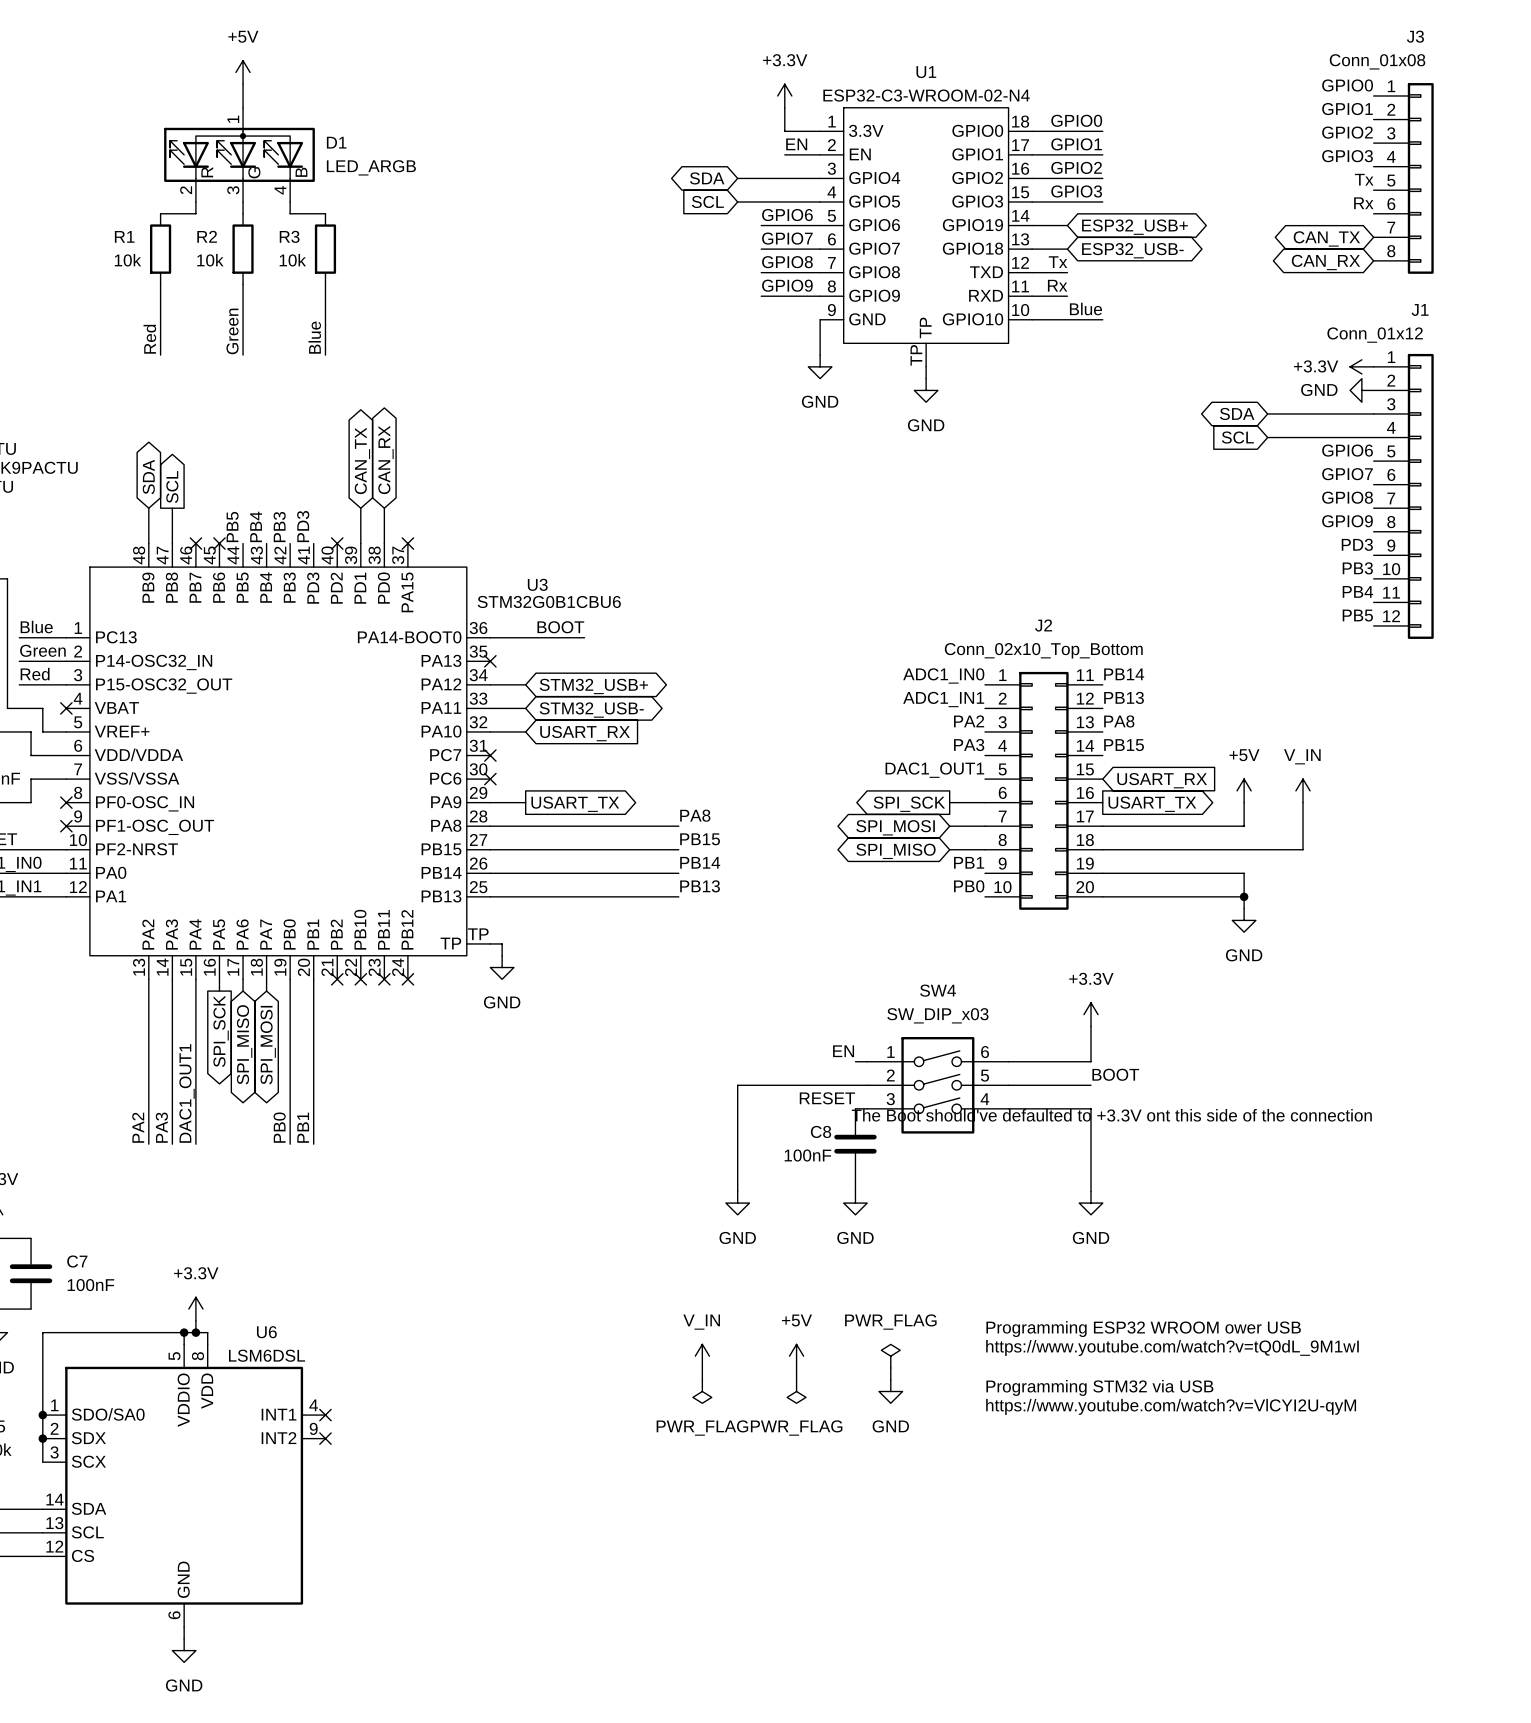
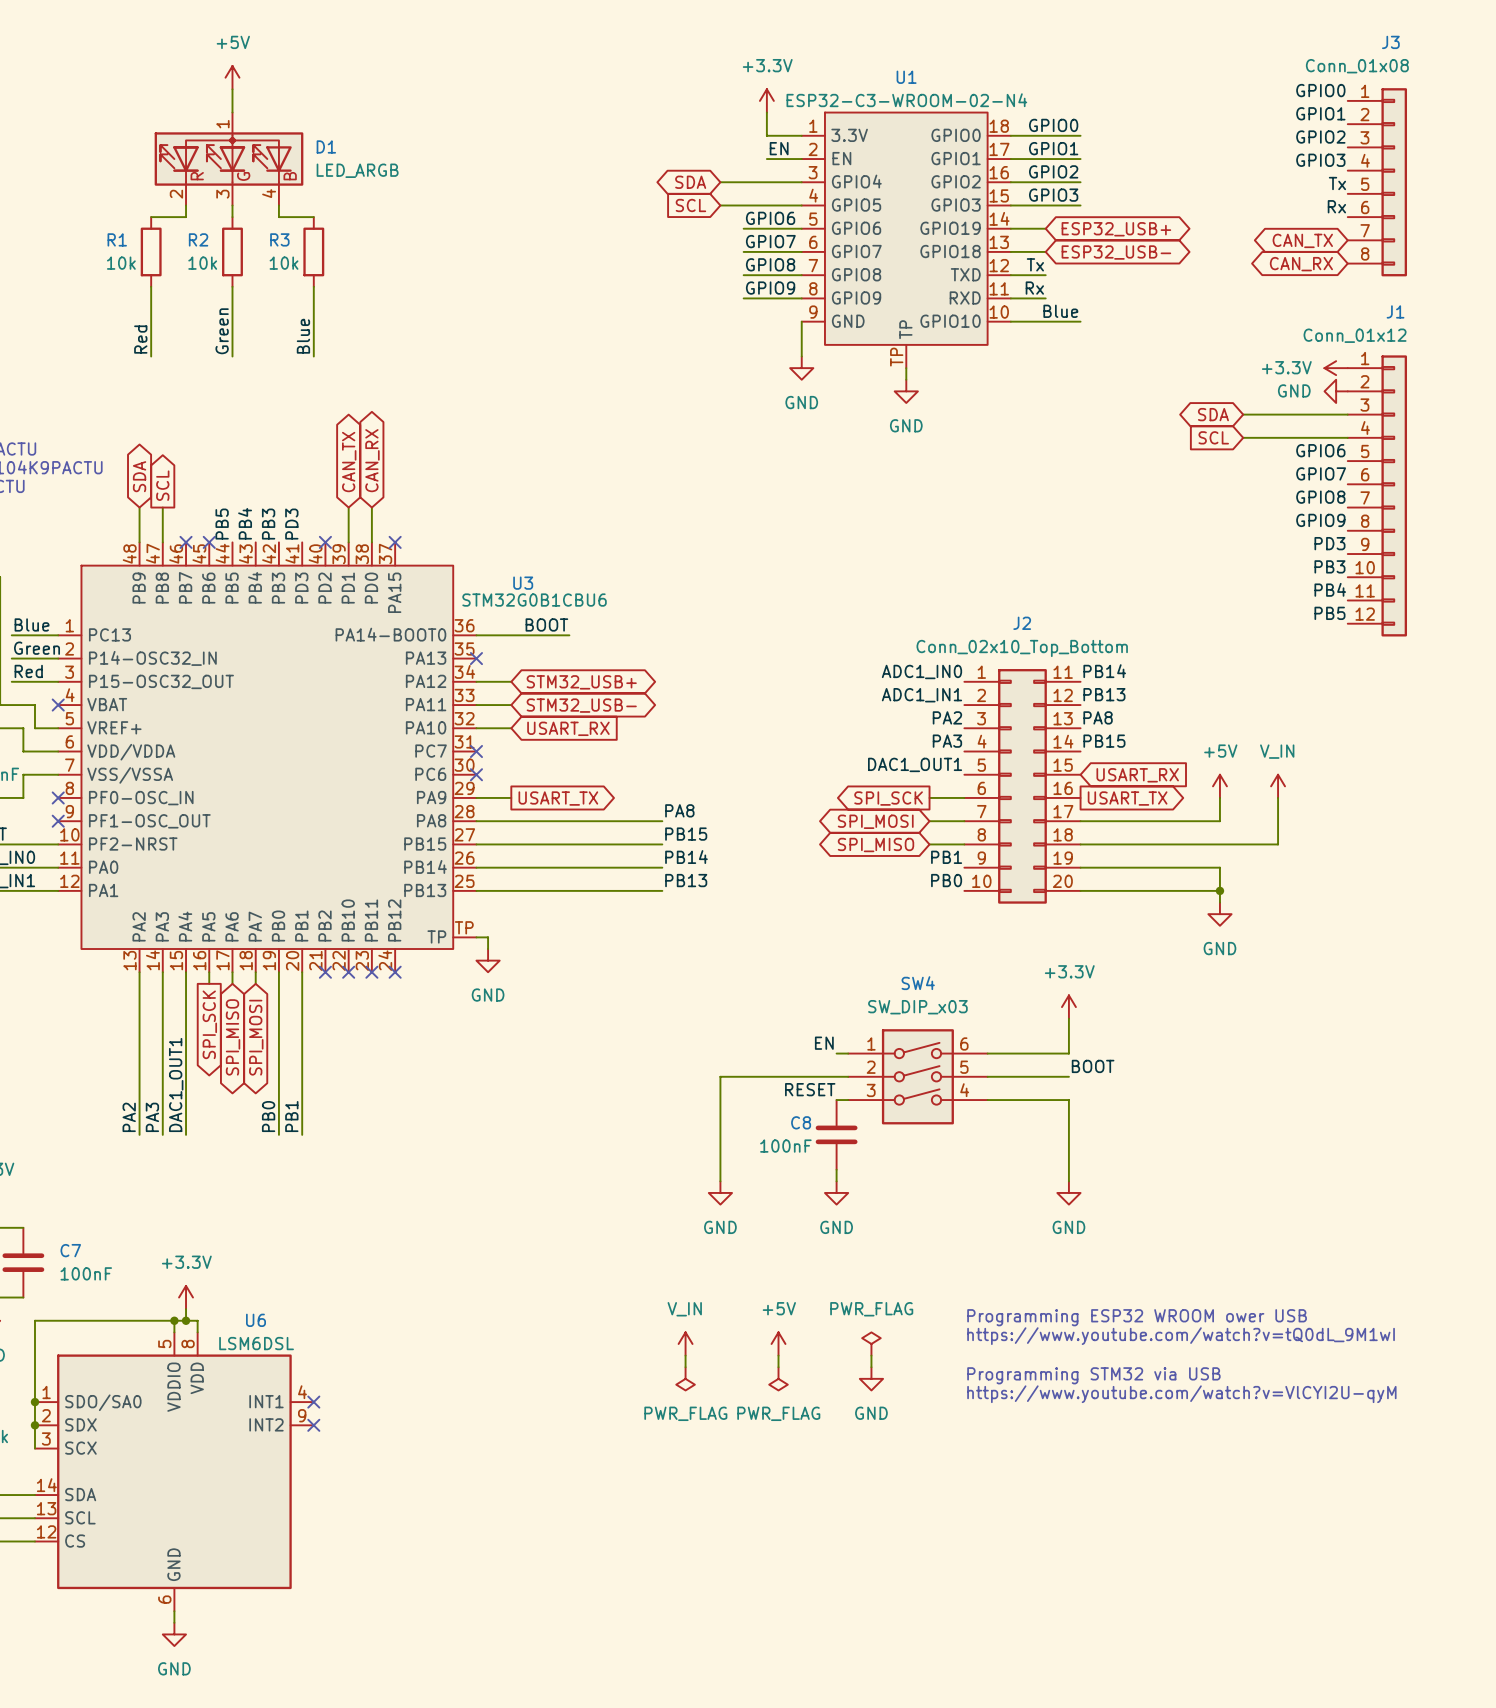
text: The Boot should've defaulted to +3.3V ont this side of the connection (1111, 1115) -> none

